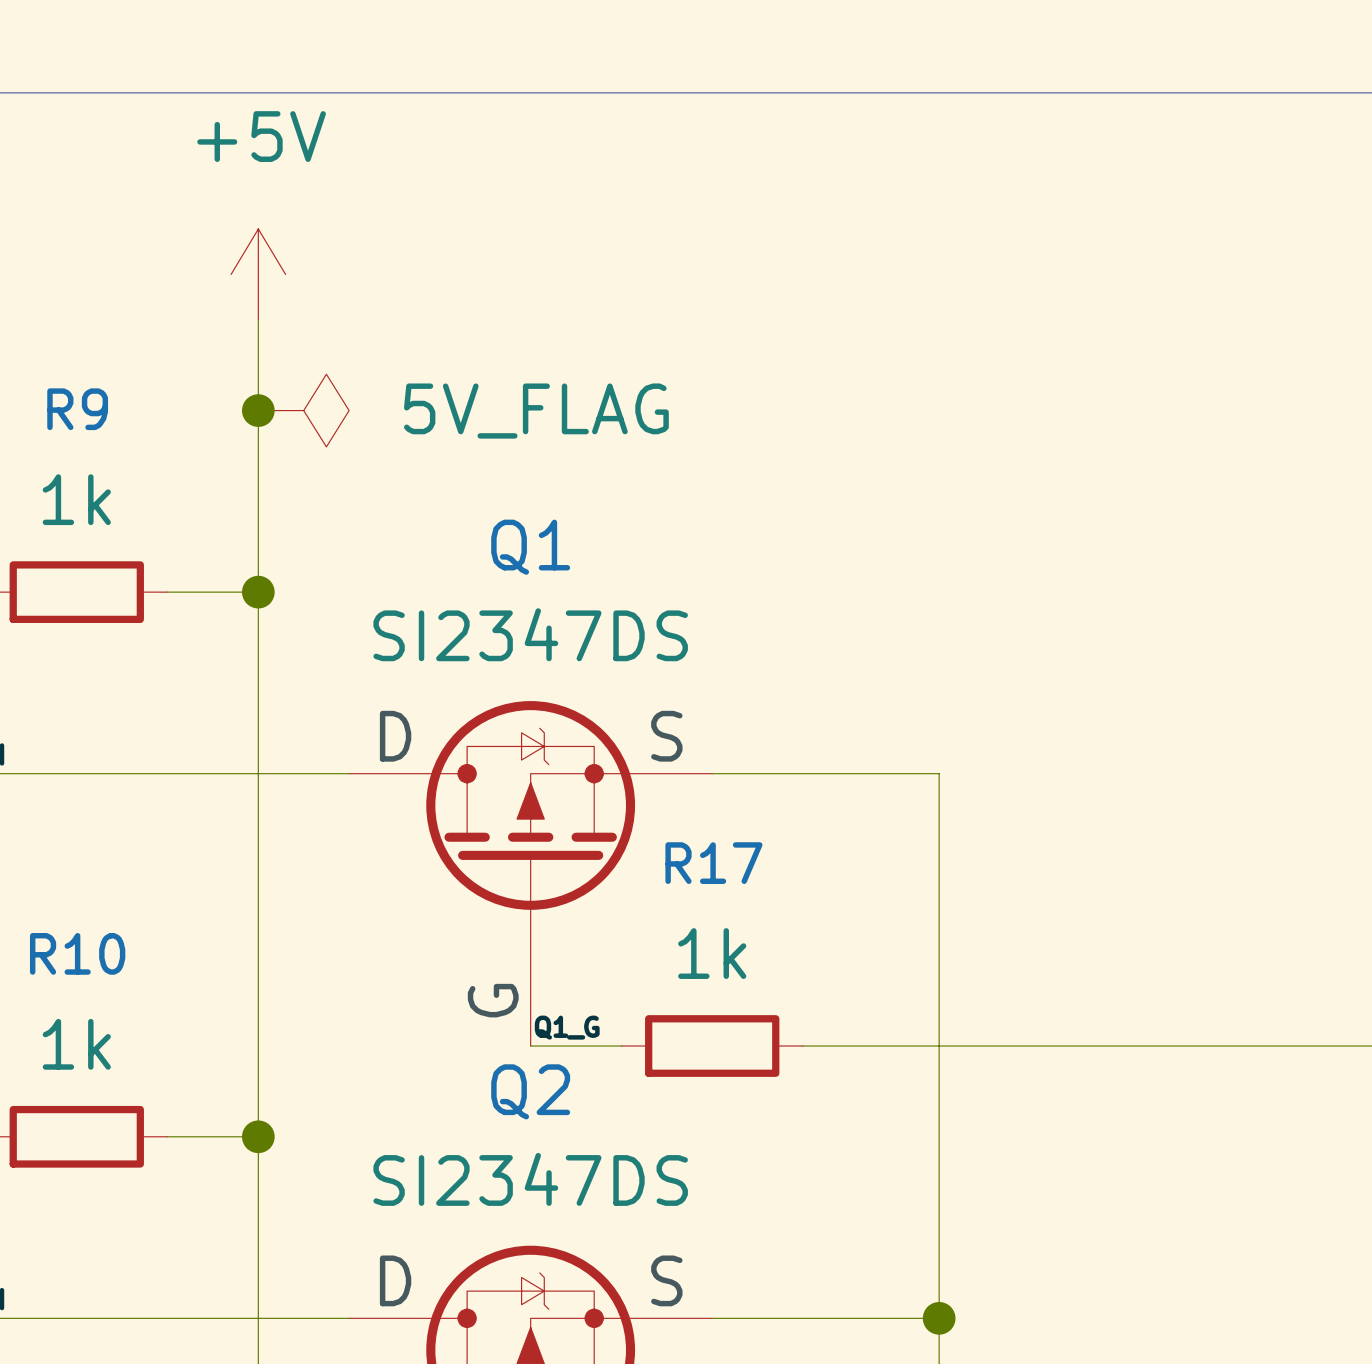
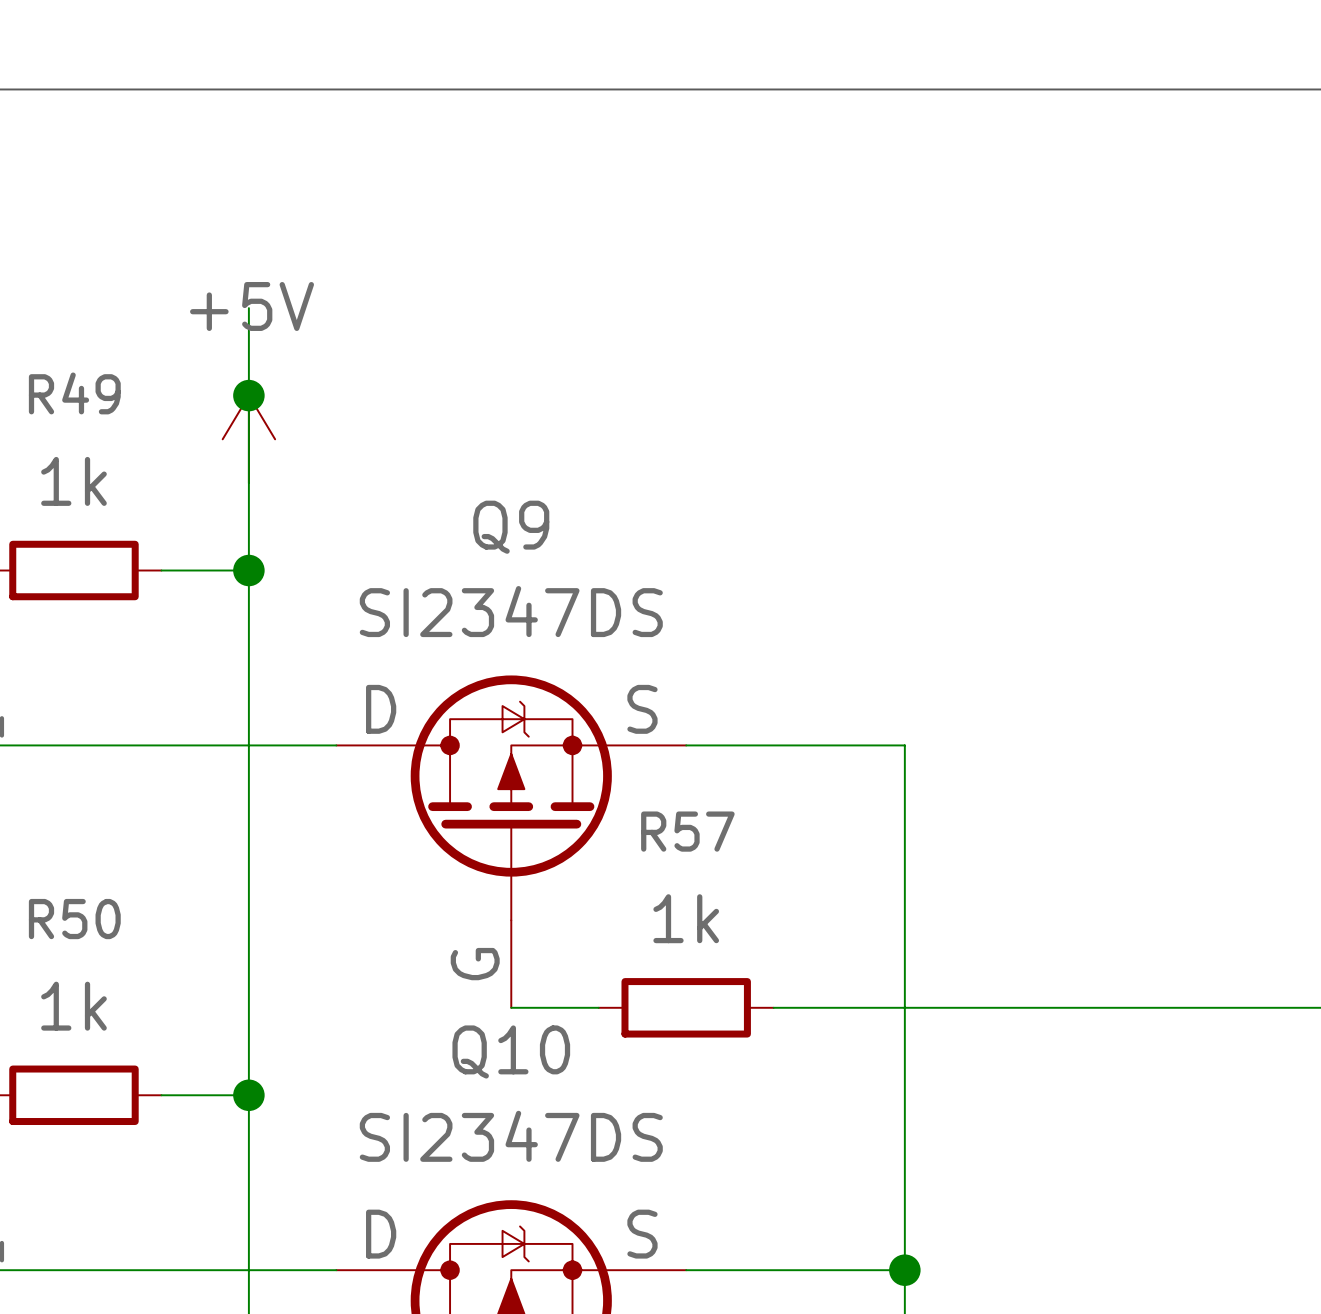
power symbol position: +5V (258, 274) -> +5V (248, 439)
R9 name: R9 (77, 409) -> R49 (74, 393)
power symbol: 5V_FLAG (303, 410) -> none
Q1 name: Q1 (530, 547) -> Q9 (511, 527)
R17 name: R17 (713, 863) -> R57 (687, 831)
R10 name: R10 (77, 953) -> R50 (74, 919)
label: Q1_G (567, 1027) -> none
Q2 name: Q2 (530, 1091) -> Q10 (511, 1051)

